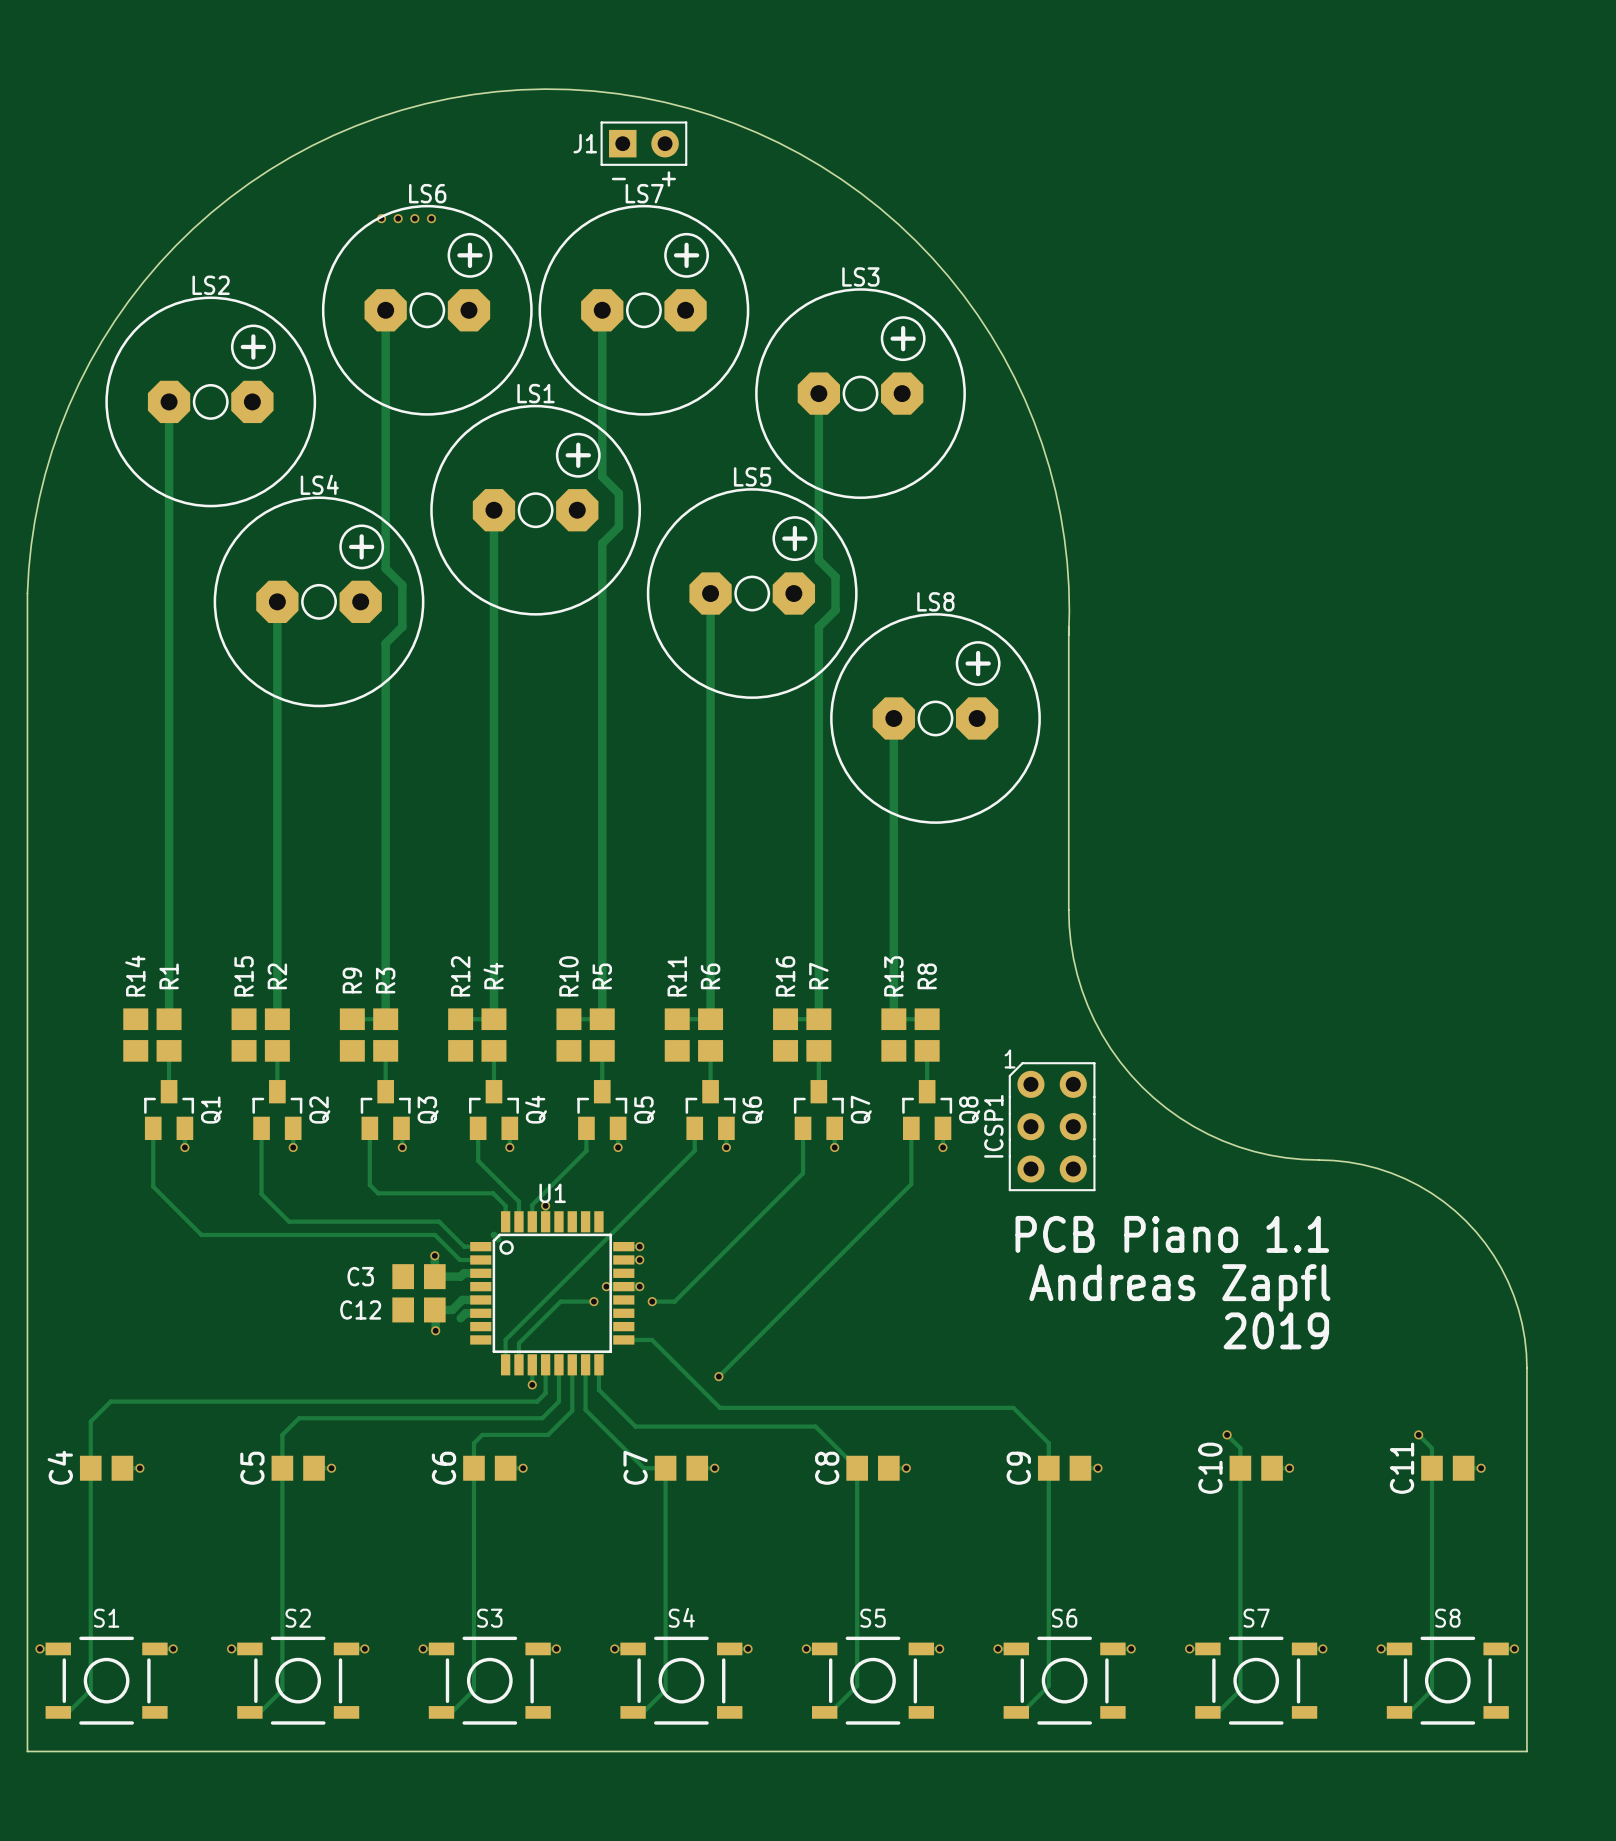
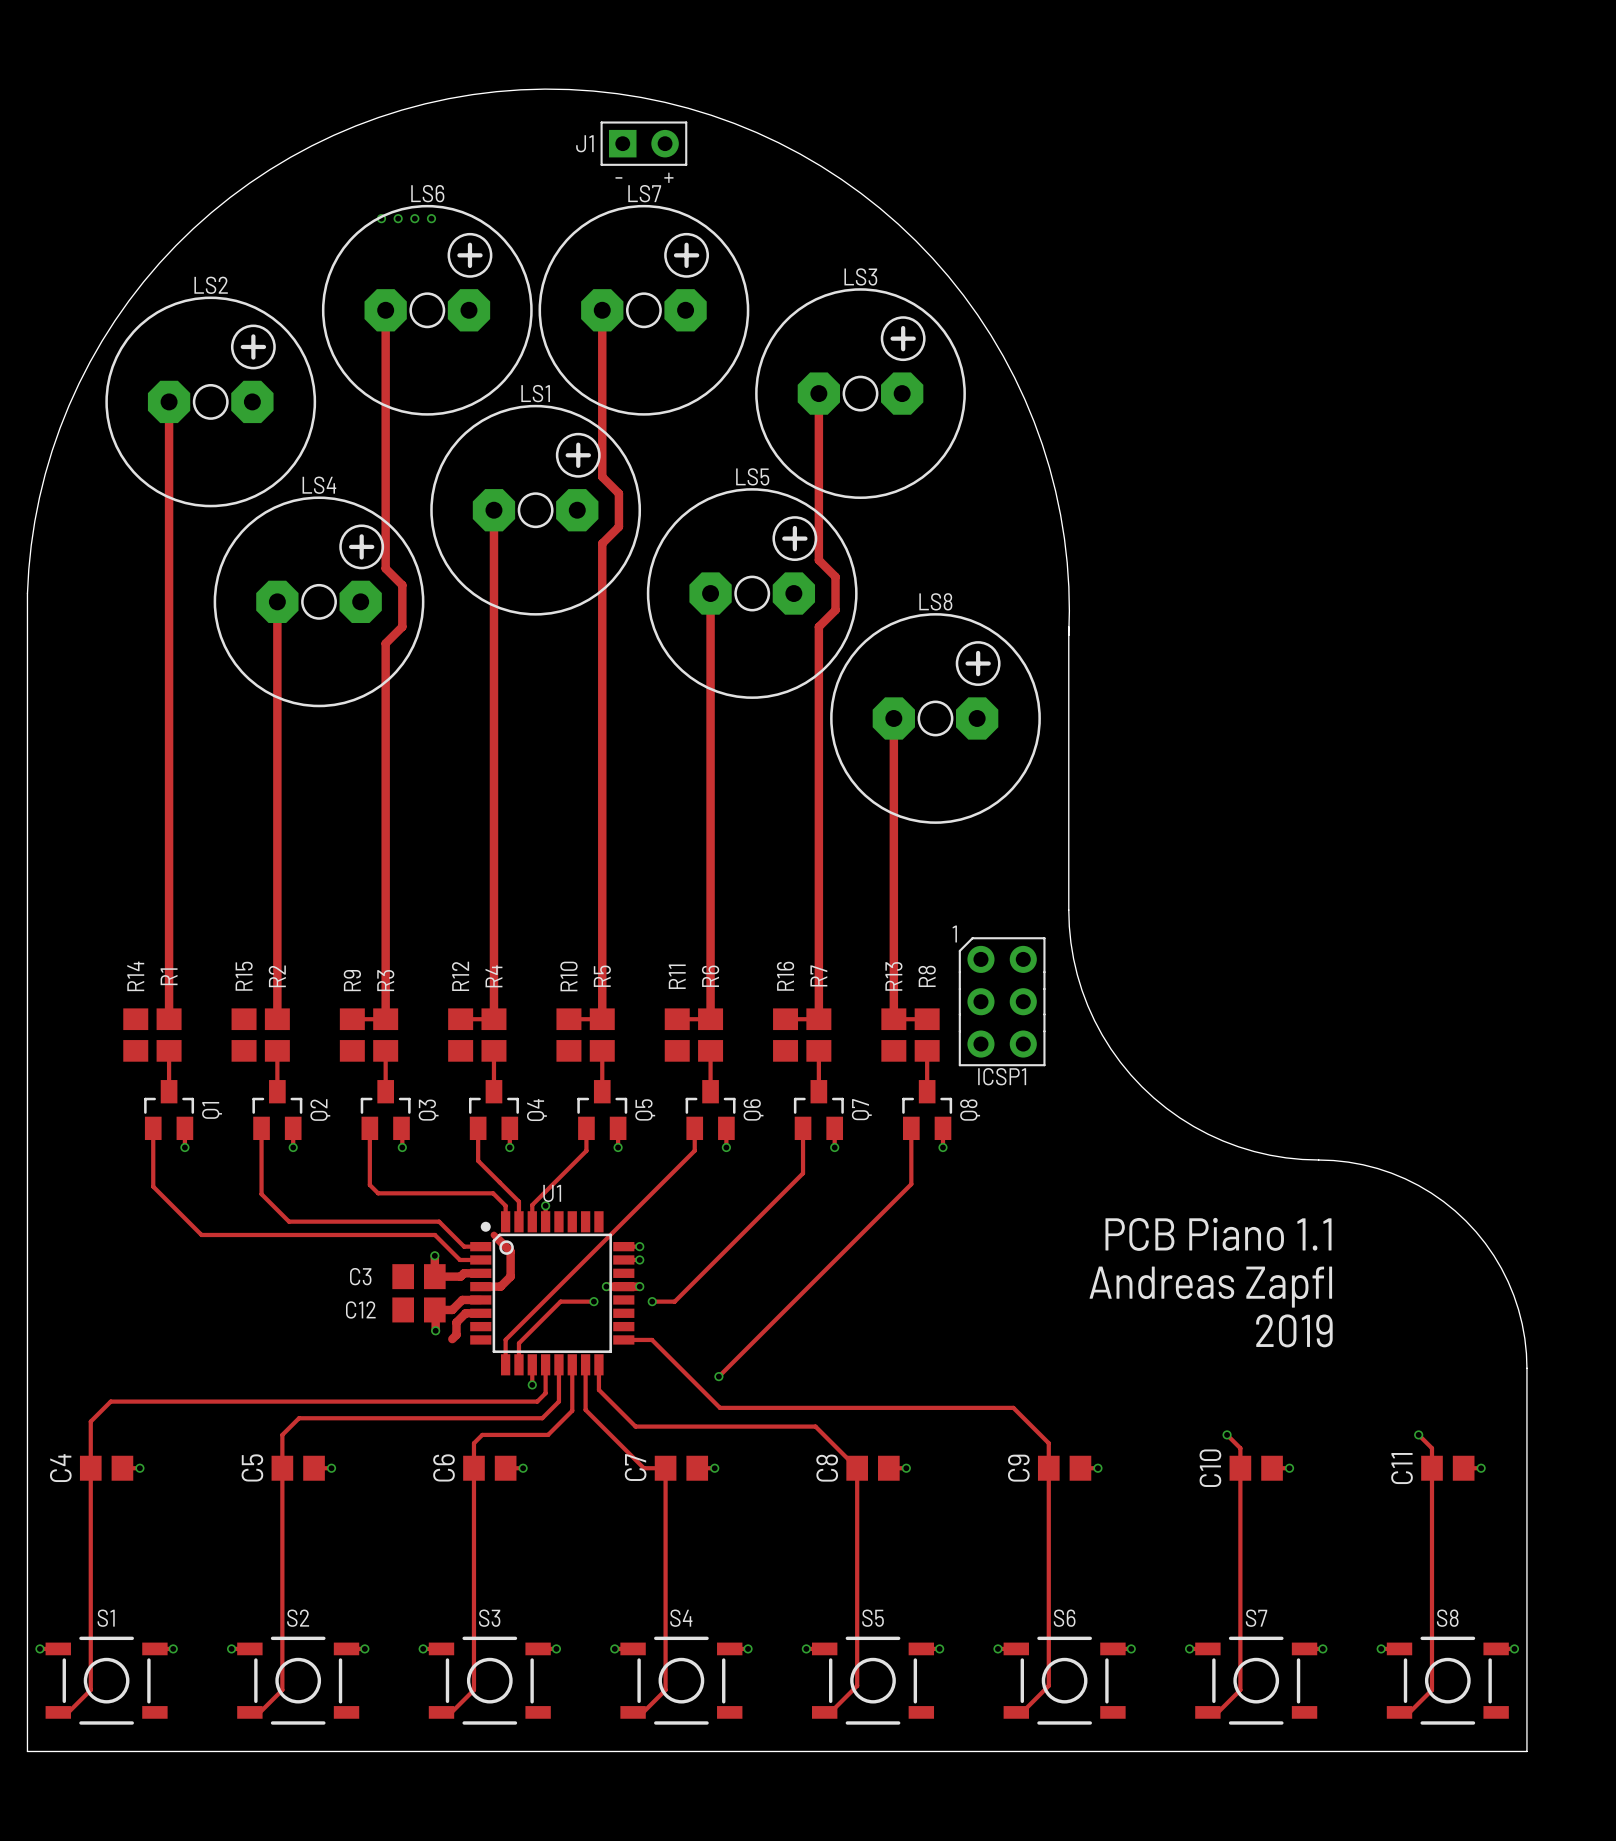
ICSP1 name rotation: 0° (993, 1126) -> 90° clockwise (1002, 1076)
ICSP1 position: (1052, 1126) -> (1002, 1001)
U1 footprint: [470, 1211, 635, 1376] -> [470, 1211, 635, 1376]
track: none -> (498, 1239) (510, 1251) (510, 1276) (500, 1286) (480, 1286)
track: none -> (460, 1318) (456, 1322) (456, 1334) (452, 1339)

